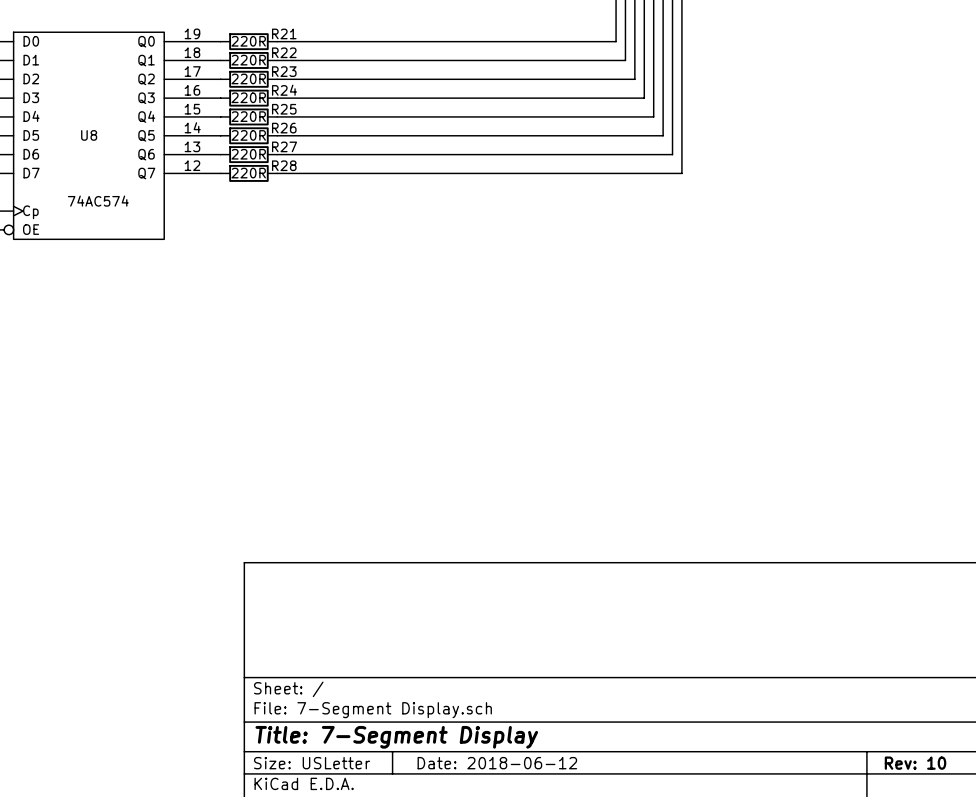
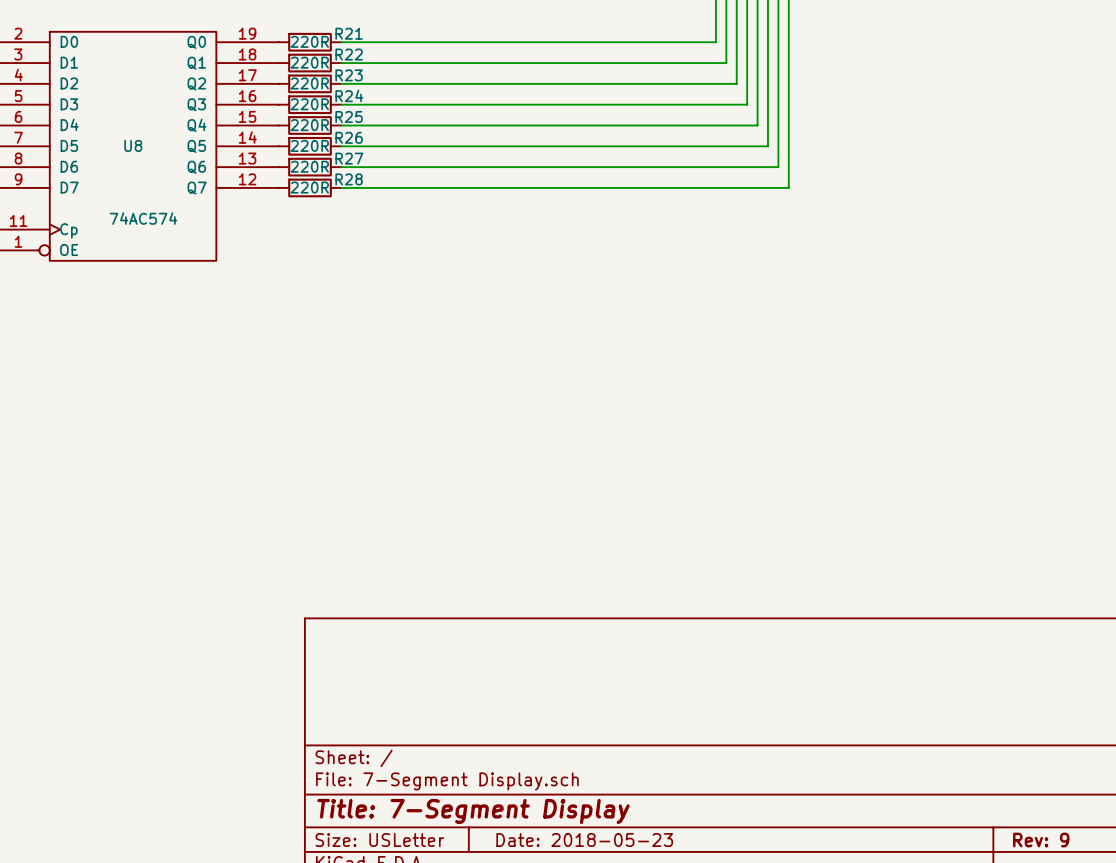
title block: Date: 2018-06-12 (497, 763) -> Date: 2018-05-23 (584, 840)
title block: Rev: 10 (915, 763) -> Rev: 9 (1041, 840)

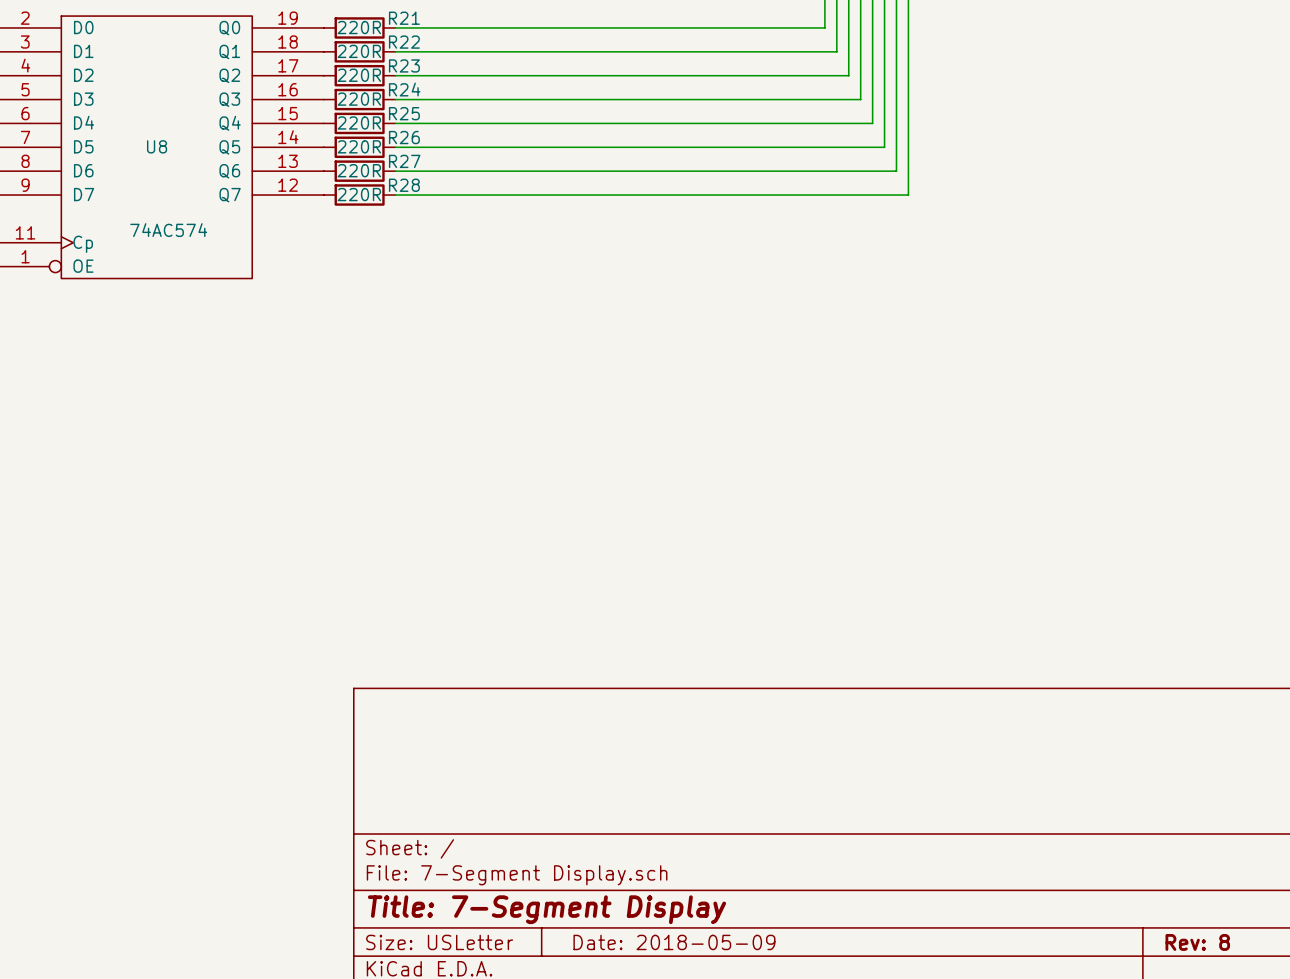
title block: Date: 2018-05-23 (584, 840) -> Date: 2018-05-09 (674, 942)
title block: Rev: 9 (1041, 840) -> Rev: 8 (1197, 942)

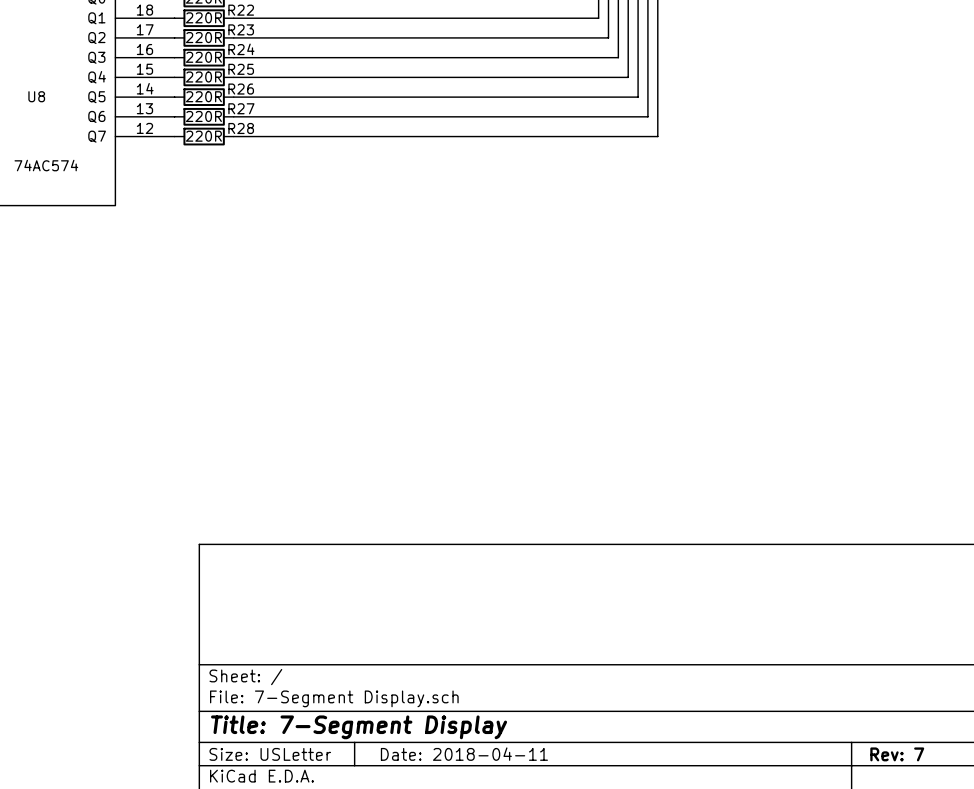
title block: Date: 2018-05-09 (674, 942) -> Date: 2018-04-11 (464, 754)
title block: Rev: 8 (1197, 942) -> Rev: 7 (897, 754)

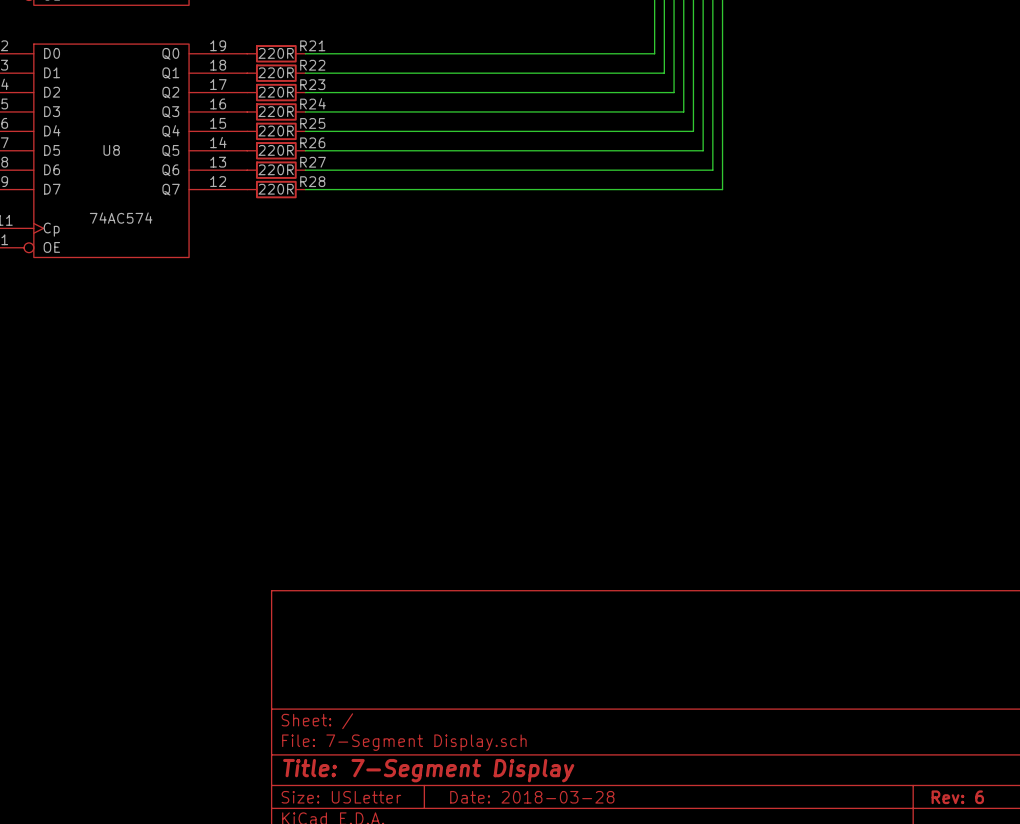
title block: Date: 2018-04-11 (464, 754) -> Date: 2018-03-28 (532, 797)
title block: Rev: 7 (897, 754) -> Rev: 6 (957, 797)

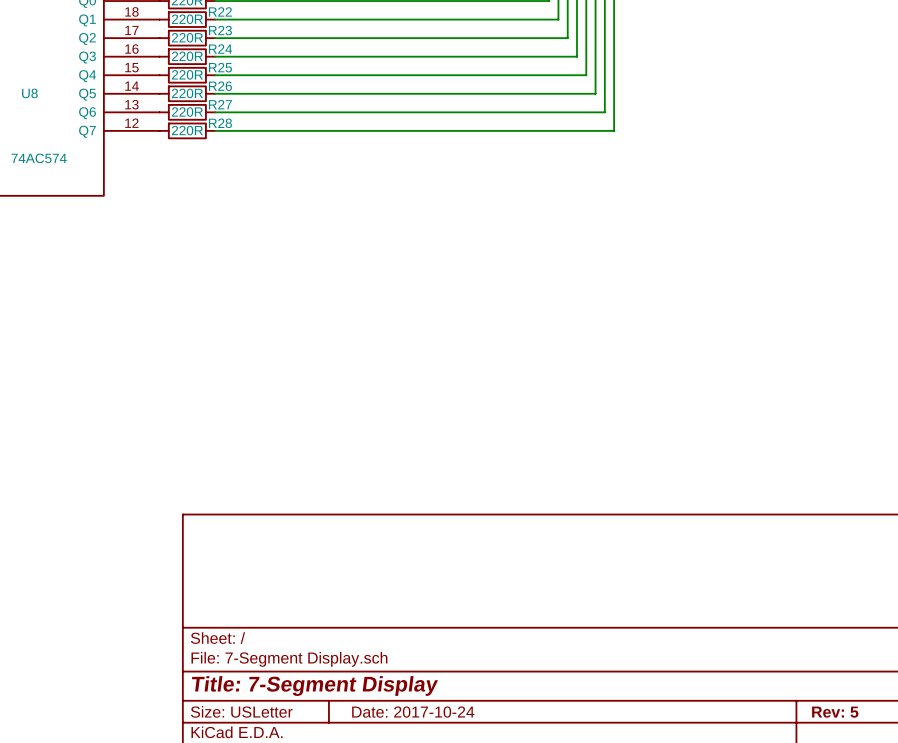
title block: Date: 2018-03-28 (532, 797) -> Date: 2017-10-24 (413, 712)
title block: Rev: 6 (957, 797) -> Rev: 5 (835, 712)

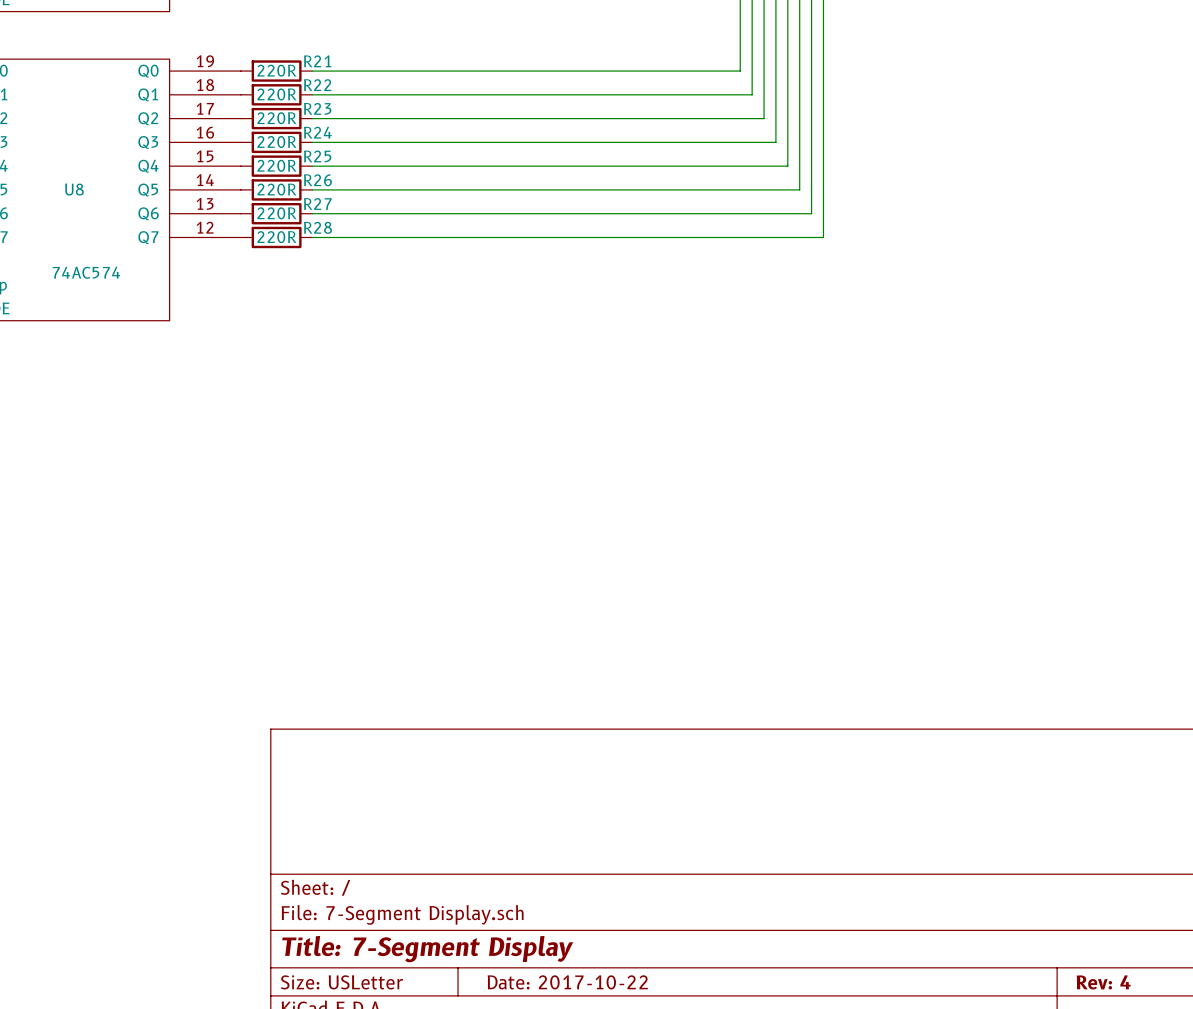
title block: Date: 2017-10-24 (413, 712) -> Date: 2017-10-22 (567, 982)
title block: Rev: 5 (835, 712) -> Rev: 4 (1103, 982)

